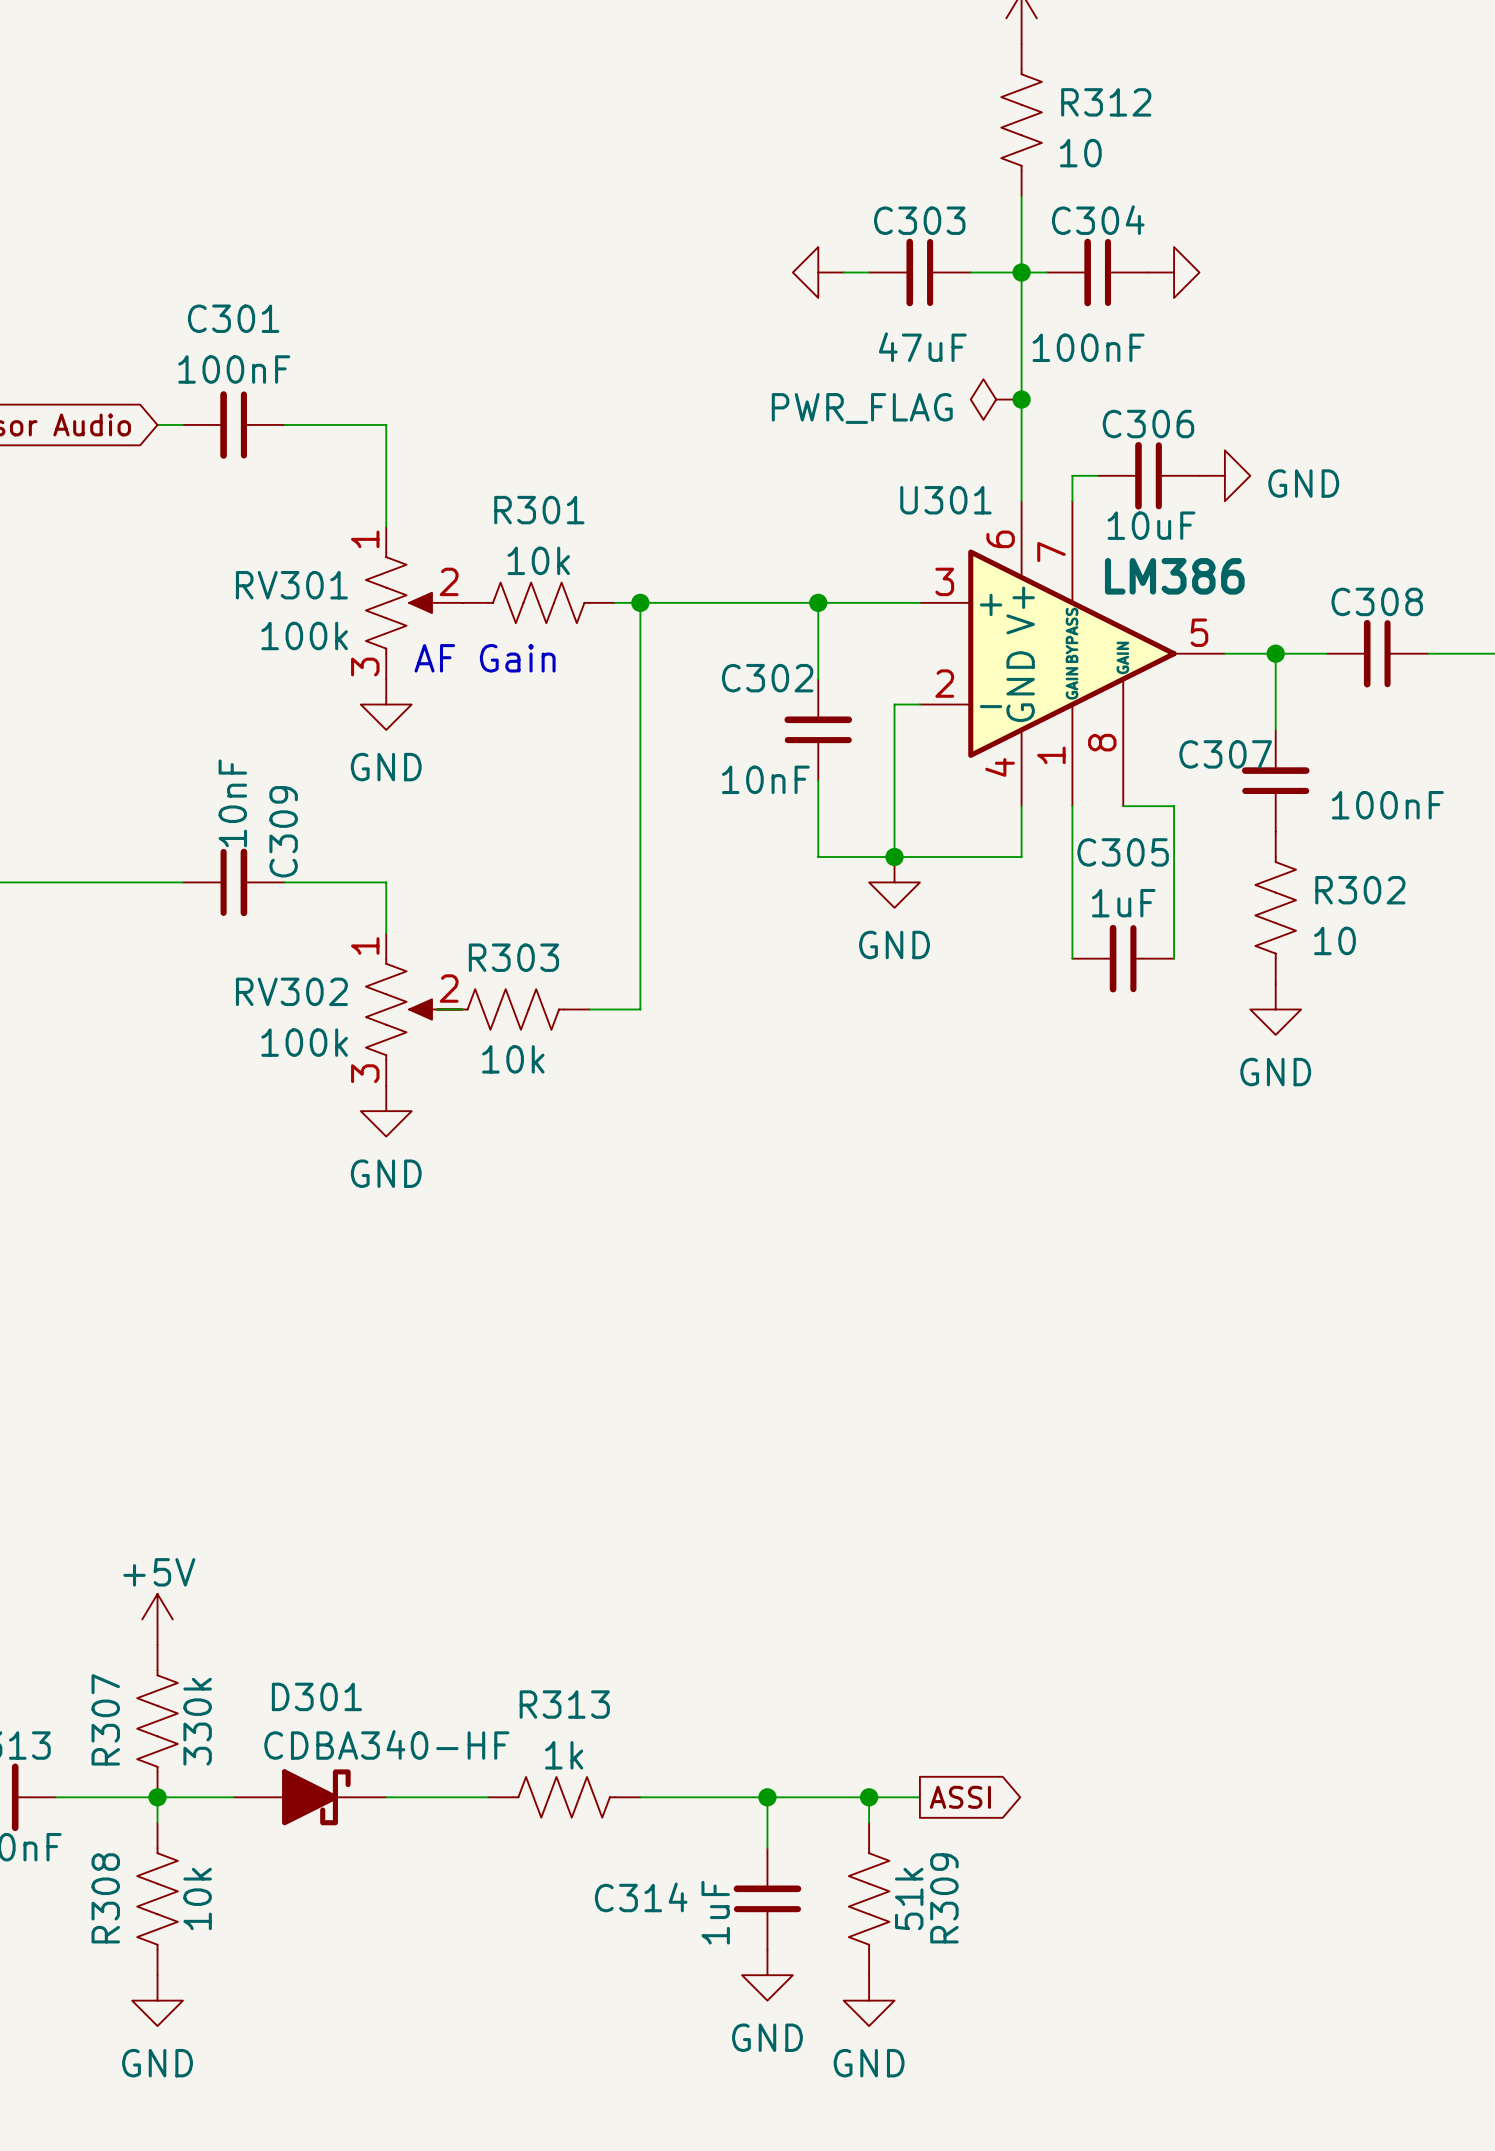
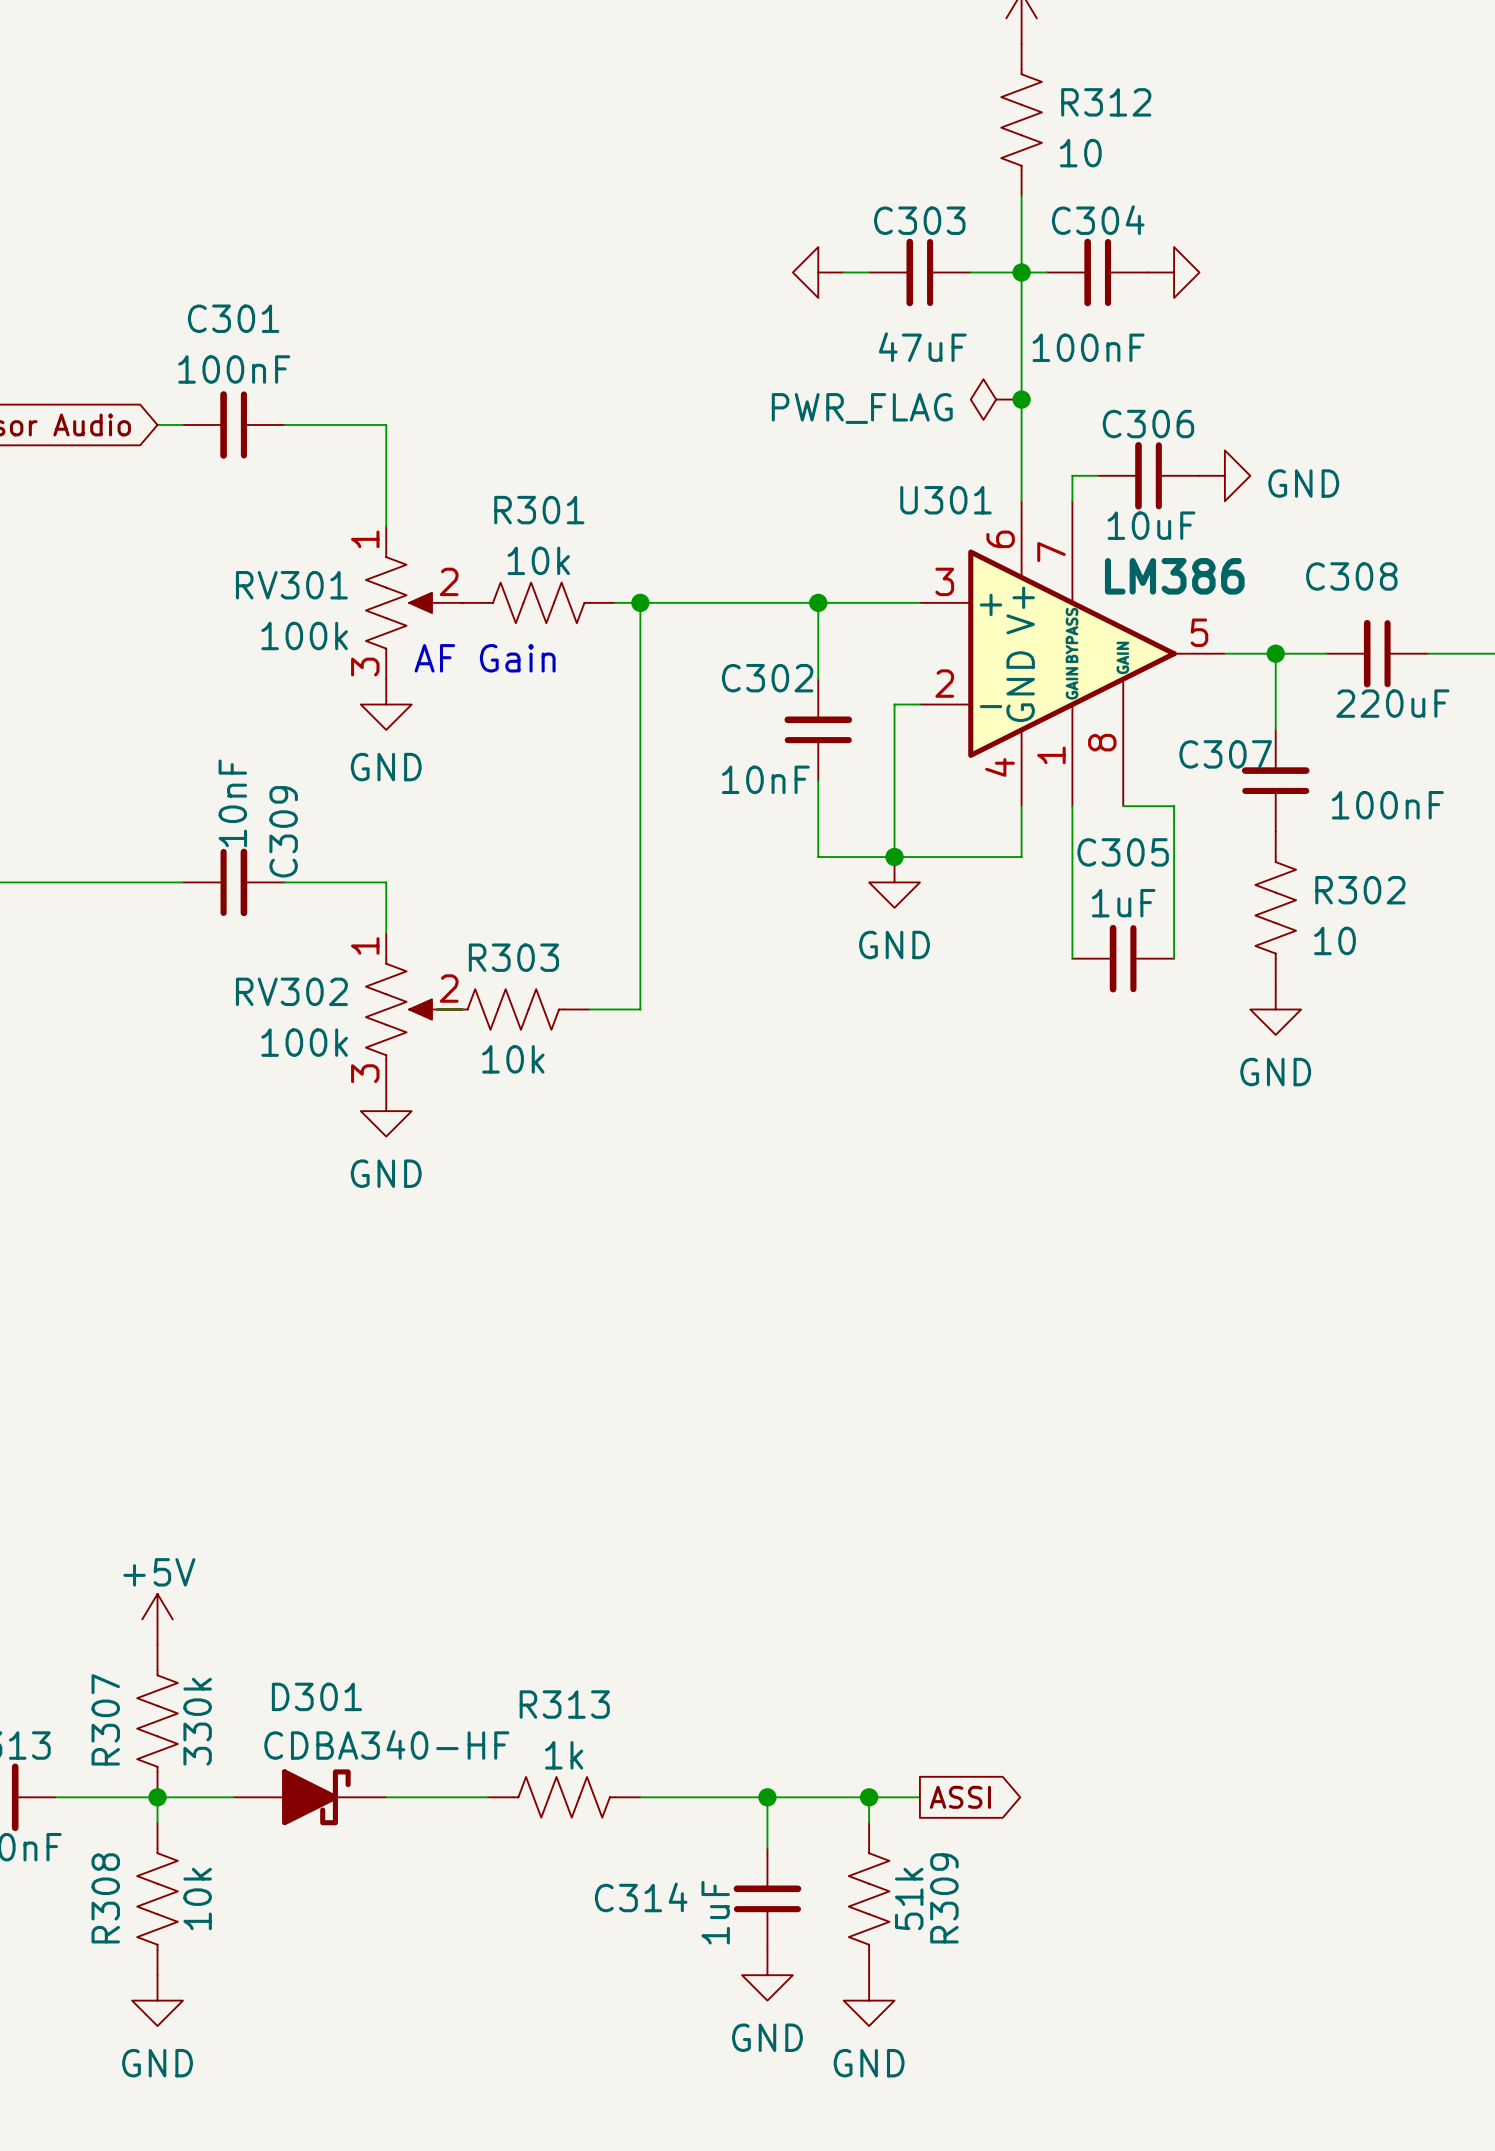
C308 name position: C308 (1377, 601) -> C308 (1351, 576)
C308 value: none -> 220uF (1392, 703)

